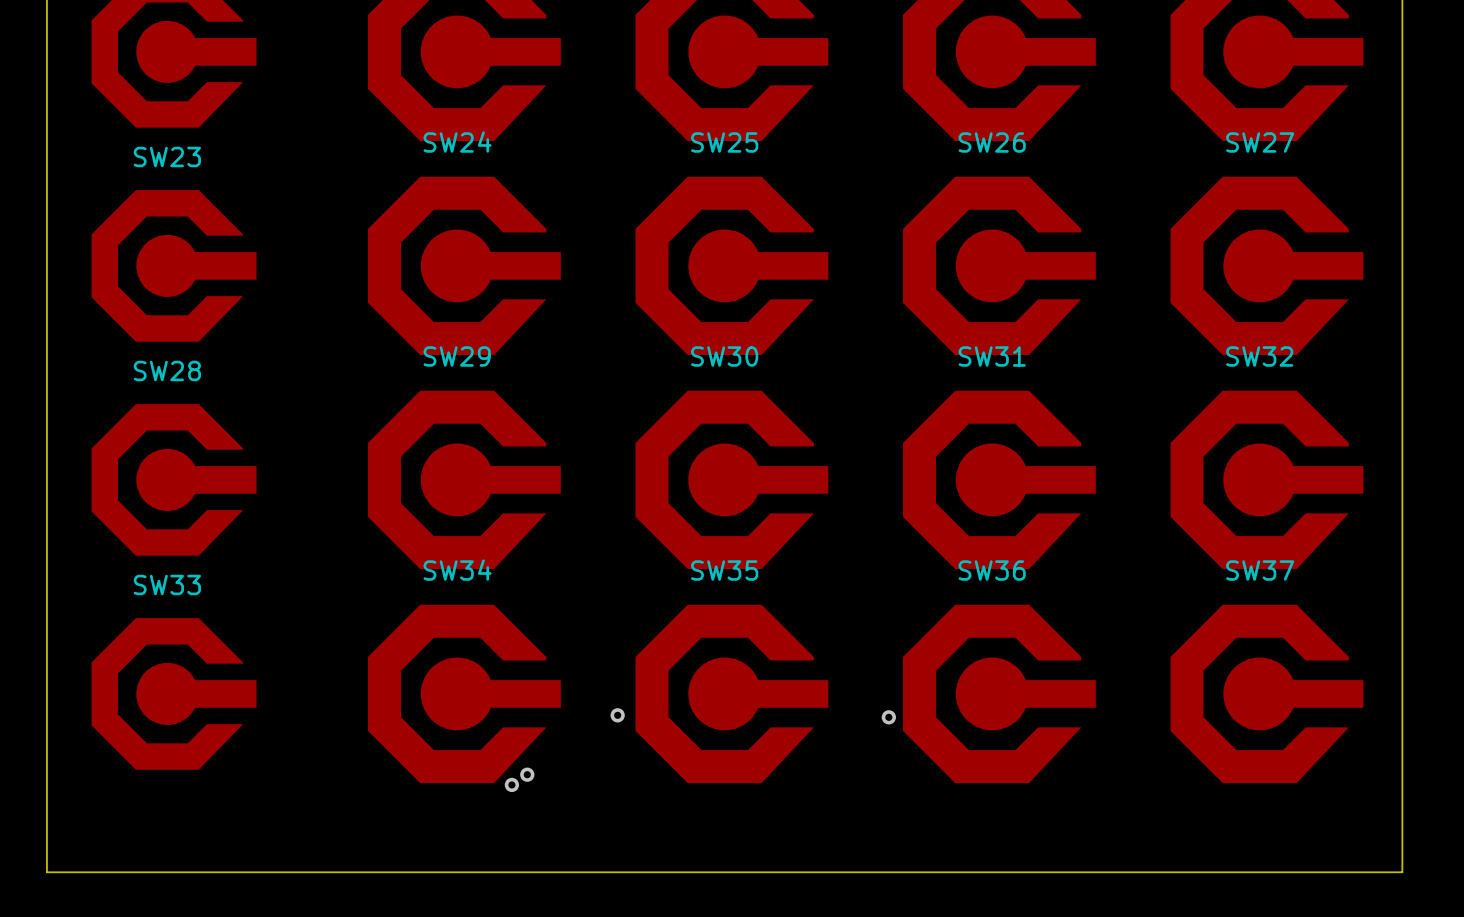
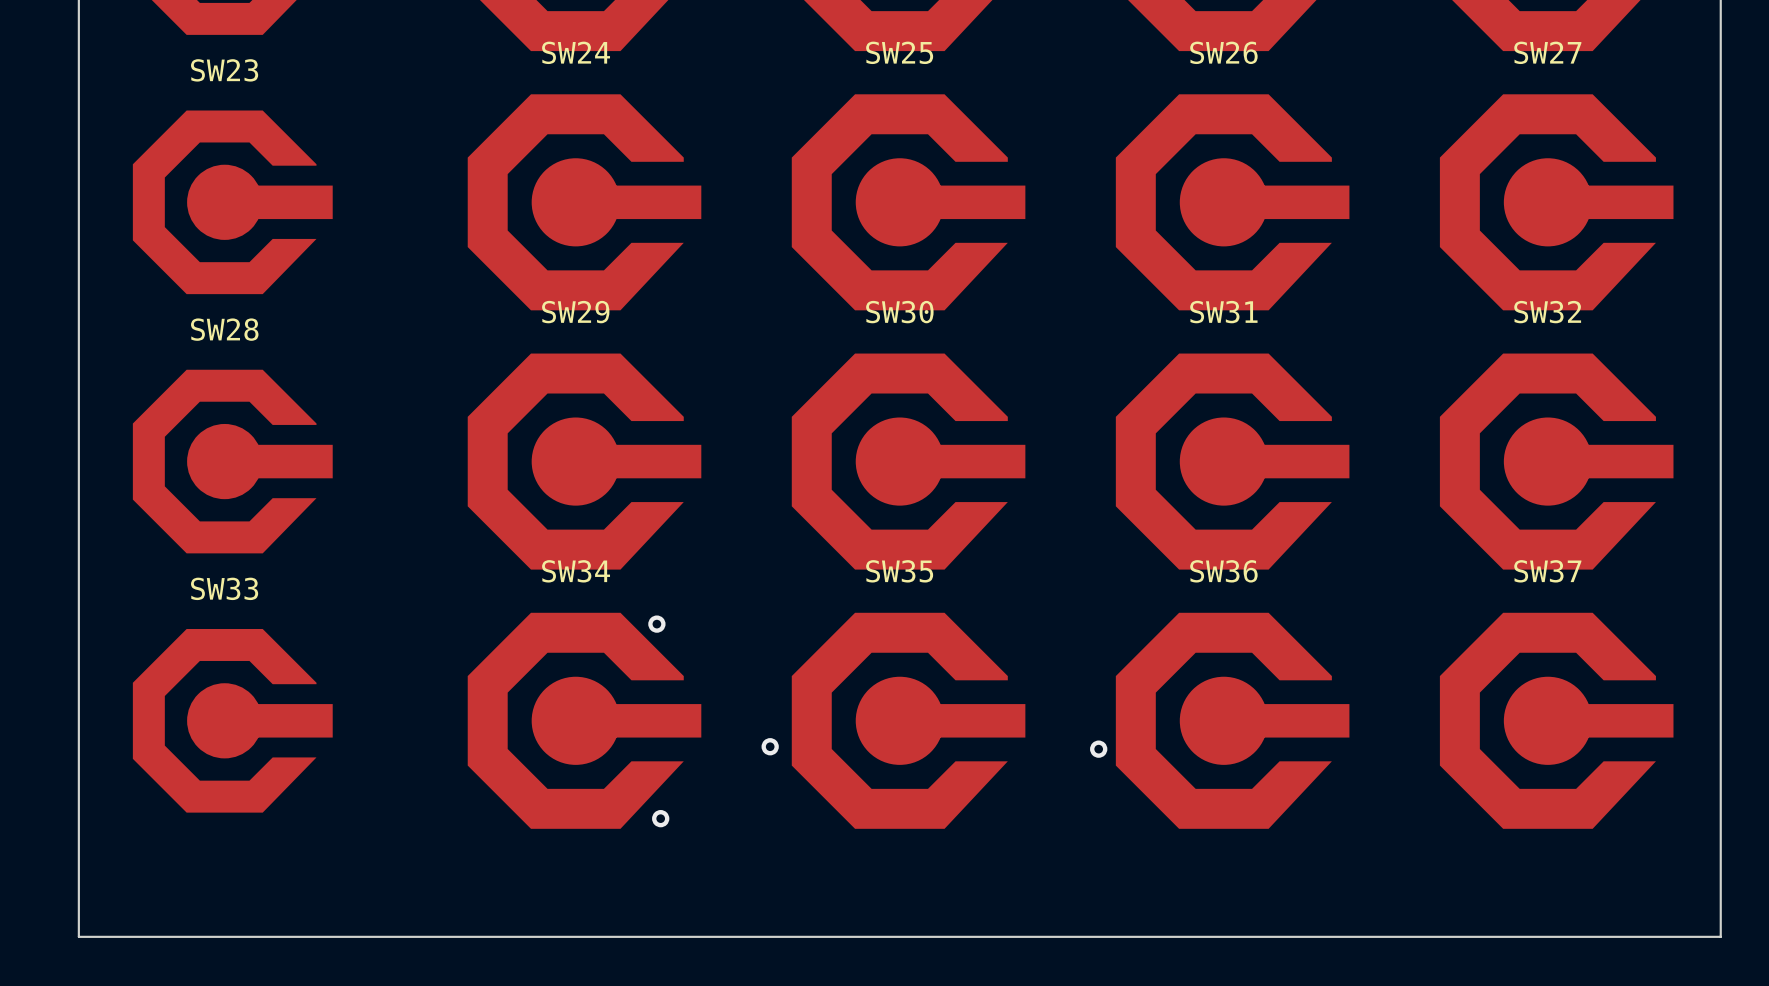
via: none -> (656, 624)
via: (511, 784) -> none

